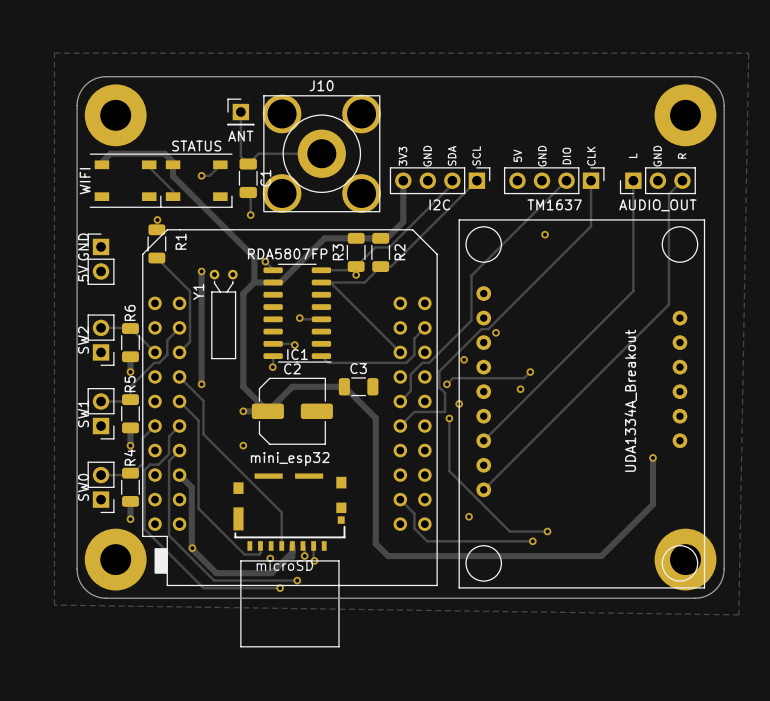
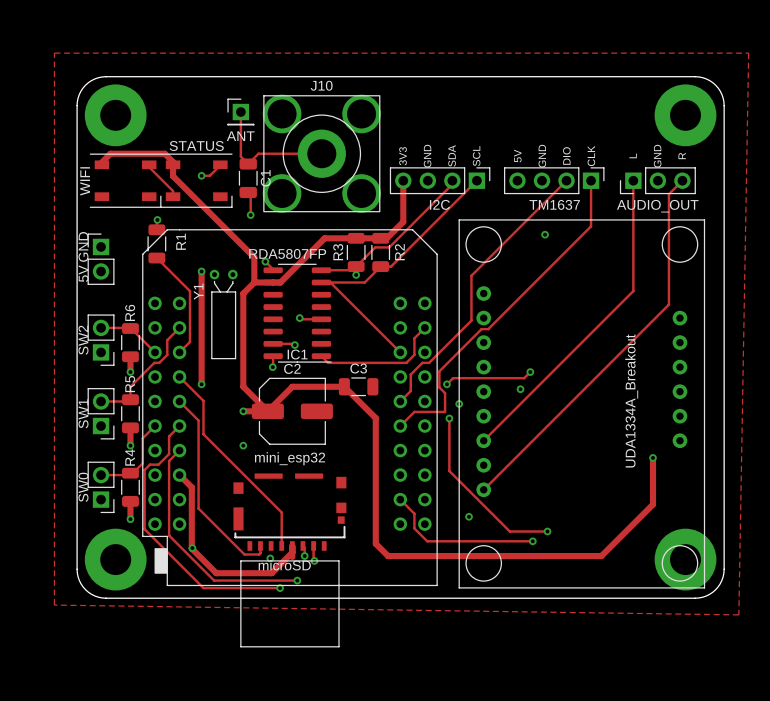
via: (495, 332) -> none
via: (464, 359) -> none

